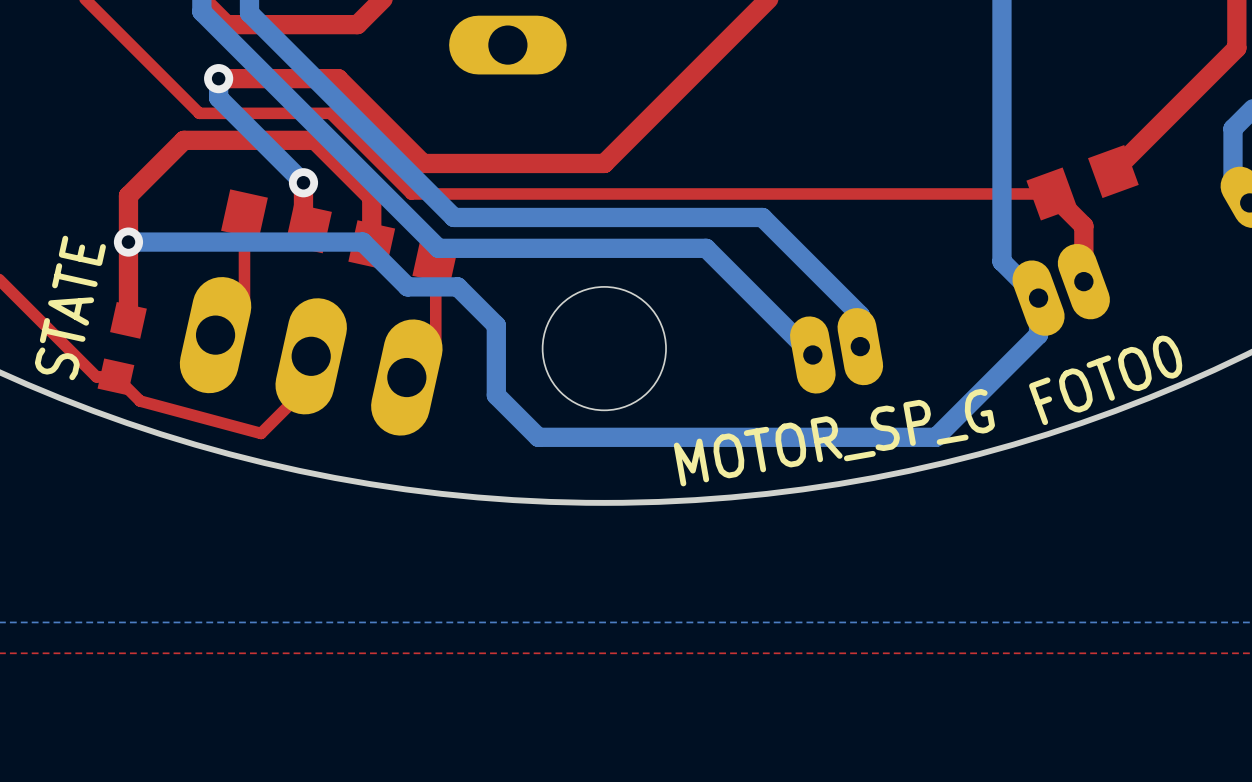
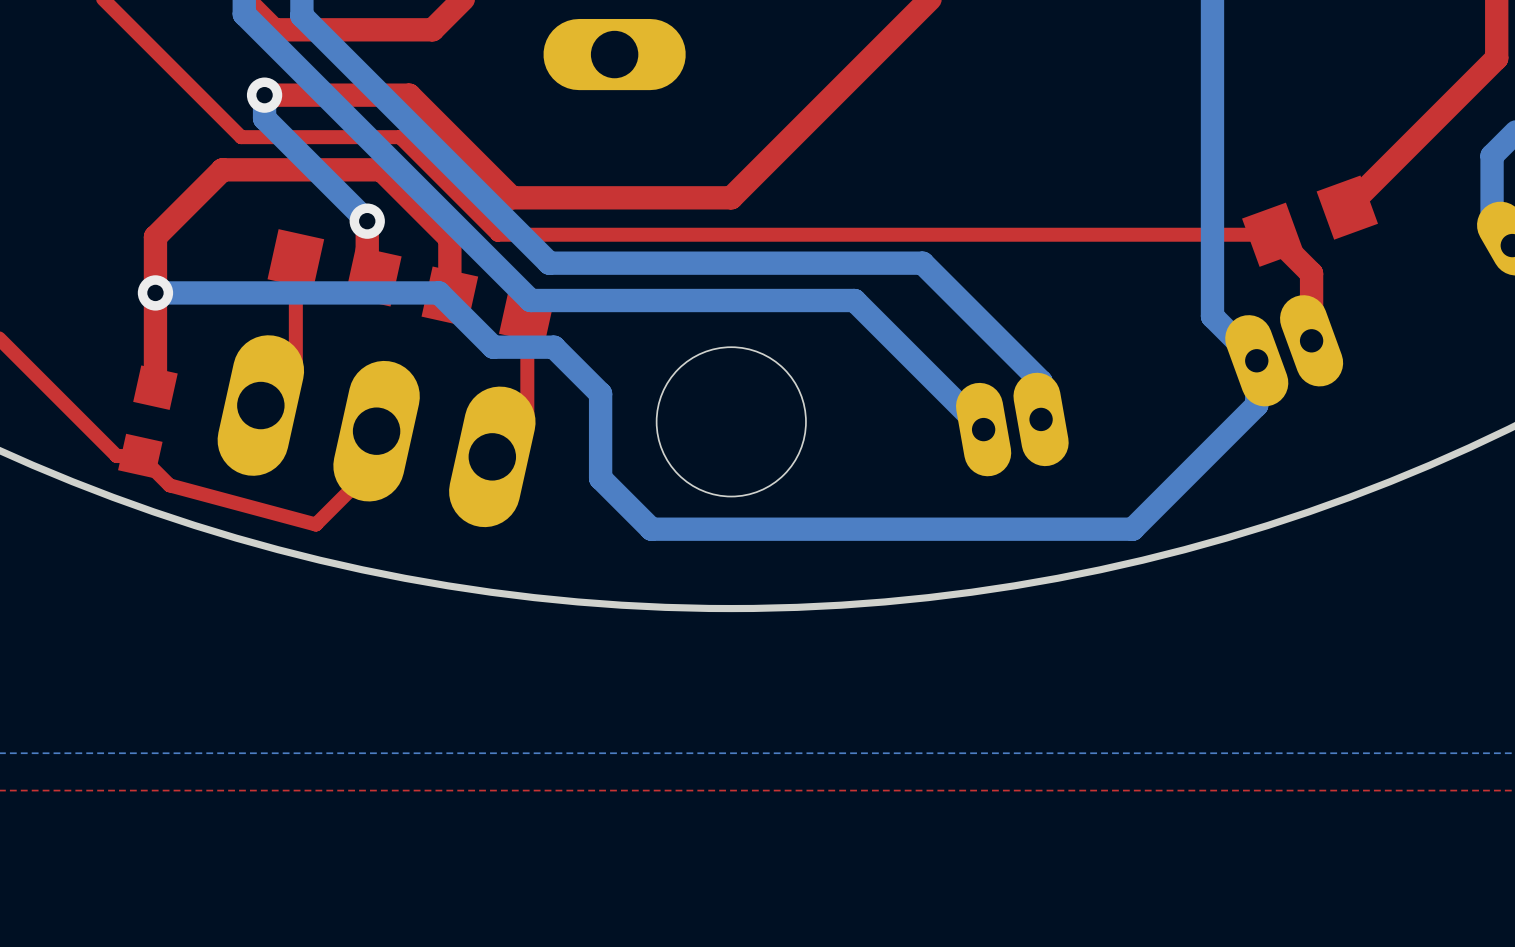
STATE name: STATE (70, 307) -> none
FOTO0 name: FOTO0 (1105, 380) -> none
MOTOR_SP_G name: MOTOR_SP_G (834, 437) -> none

